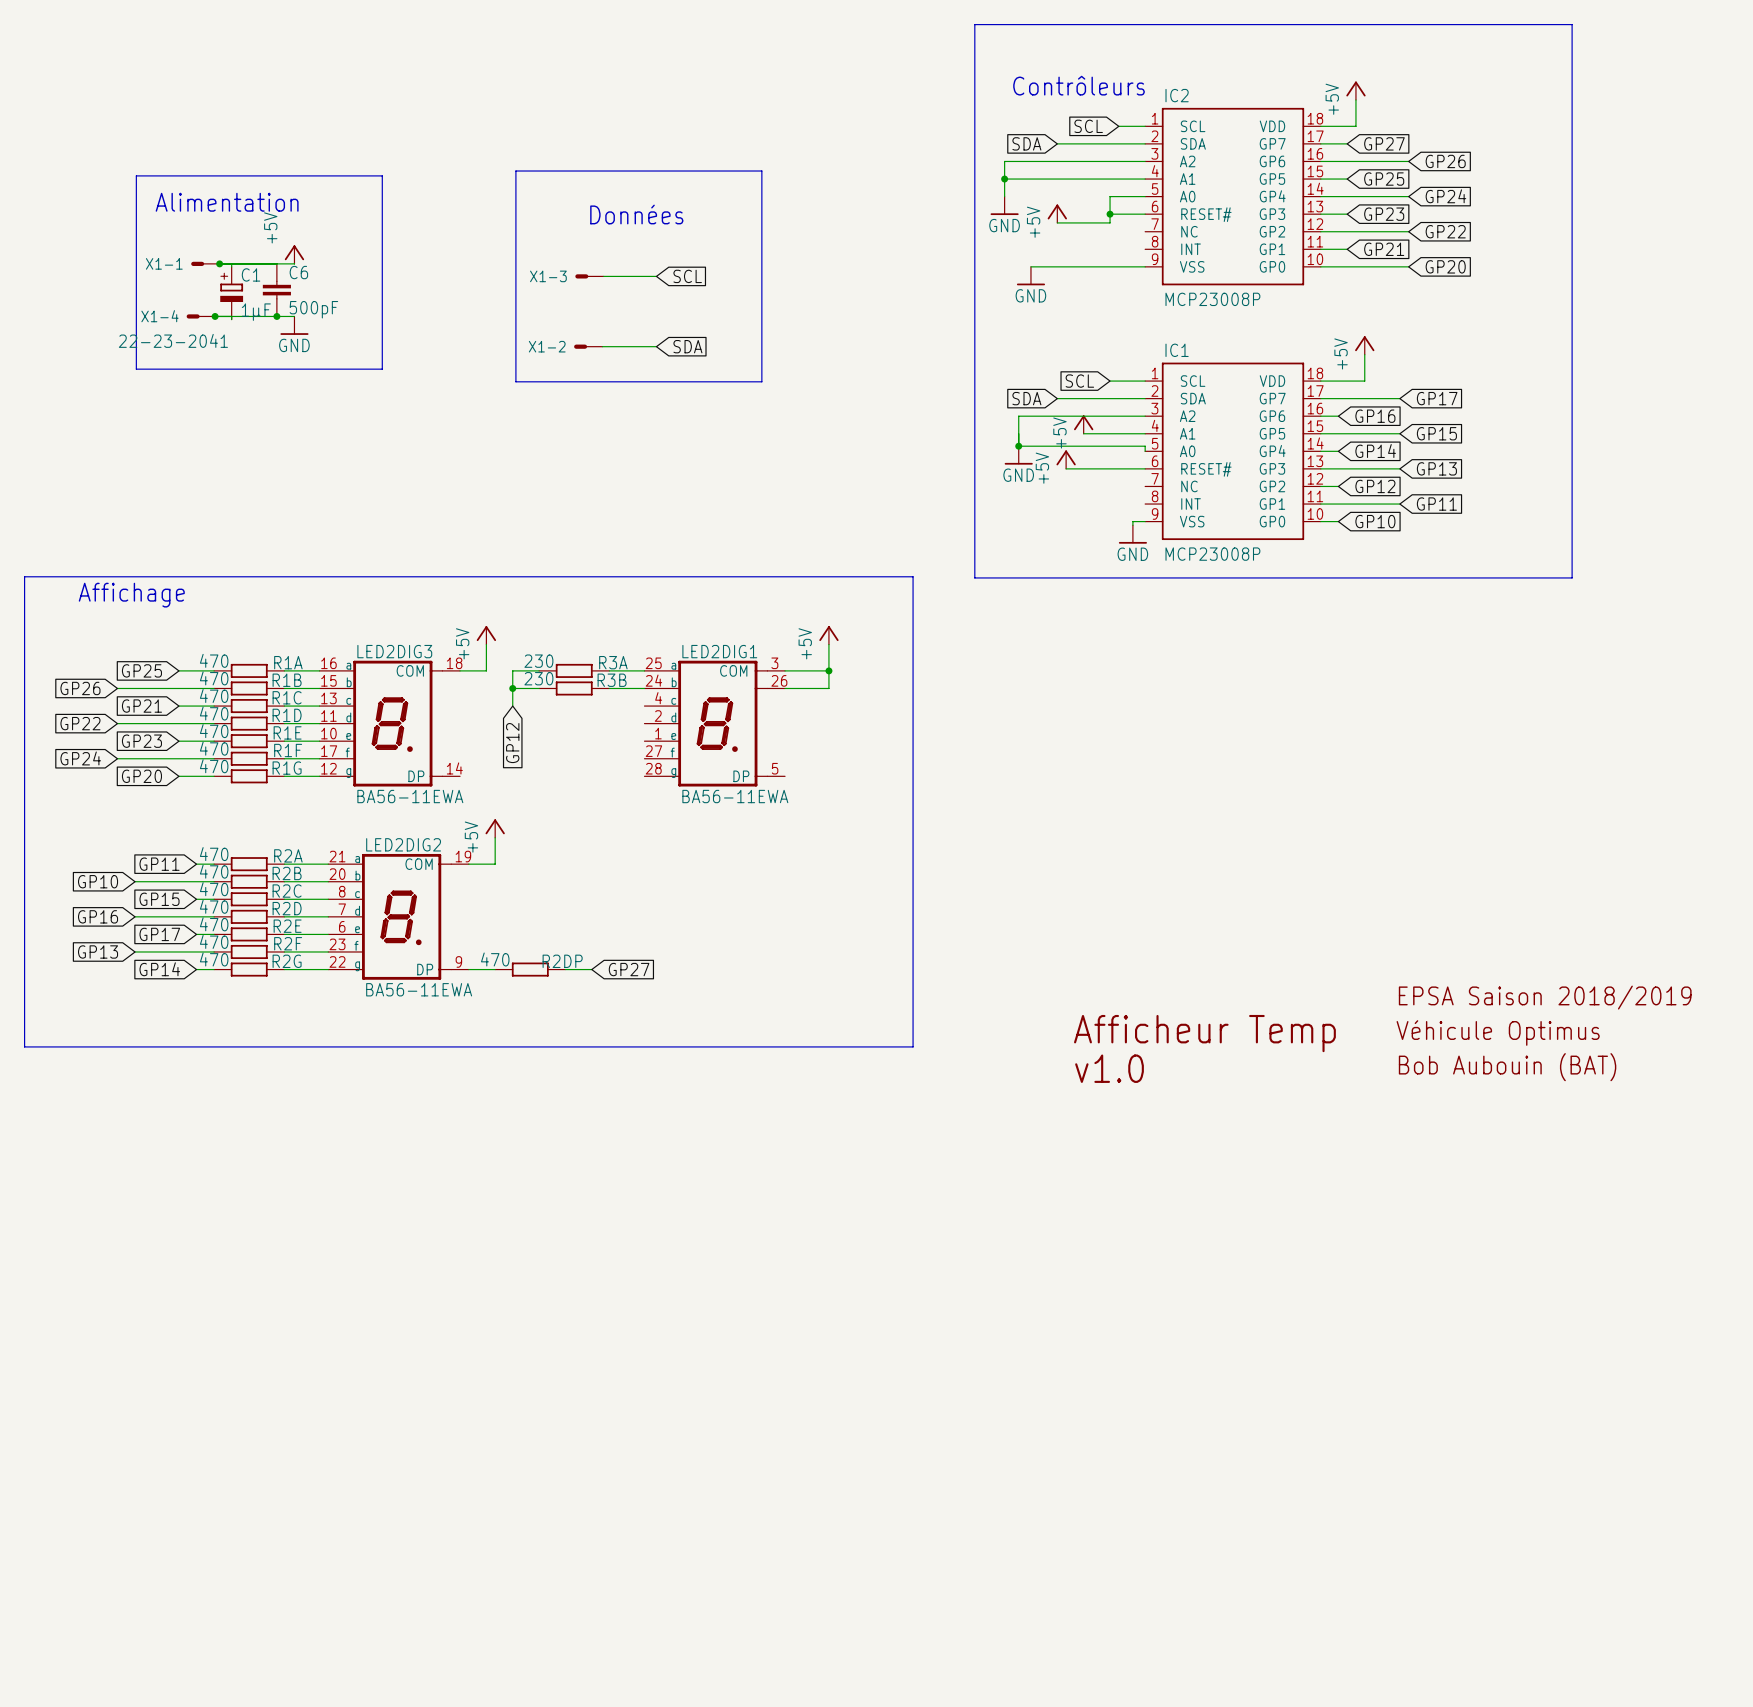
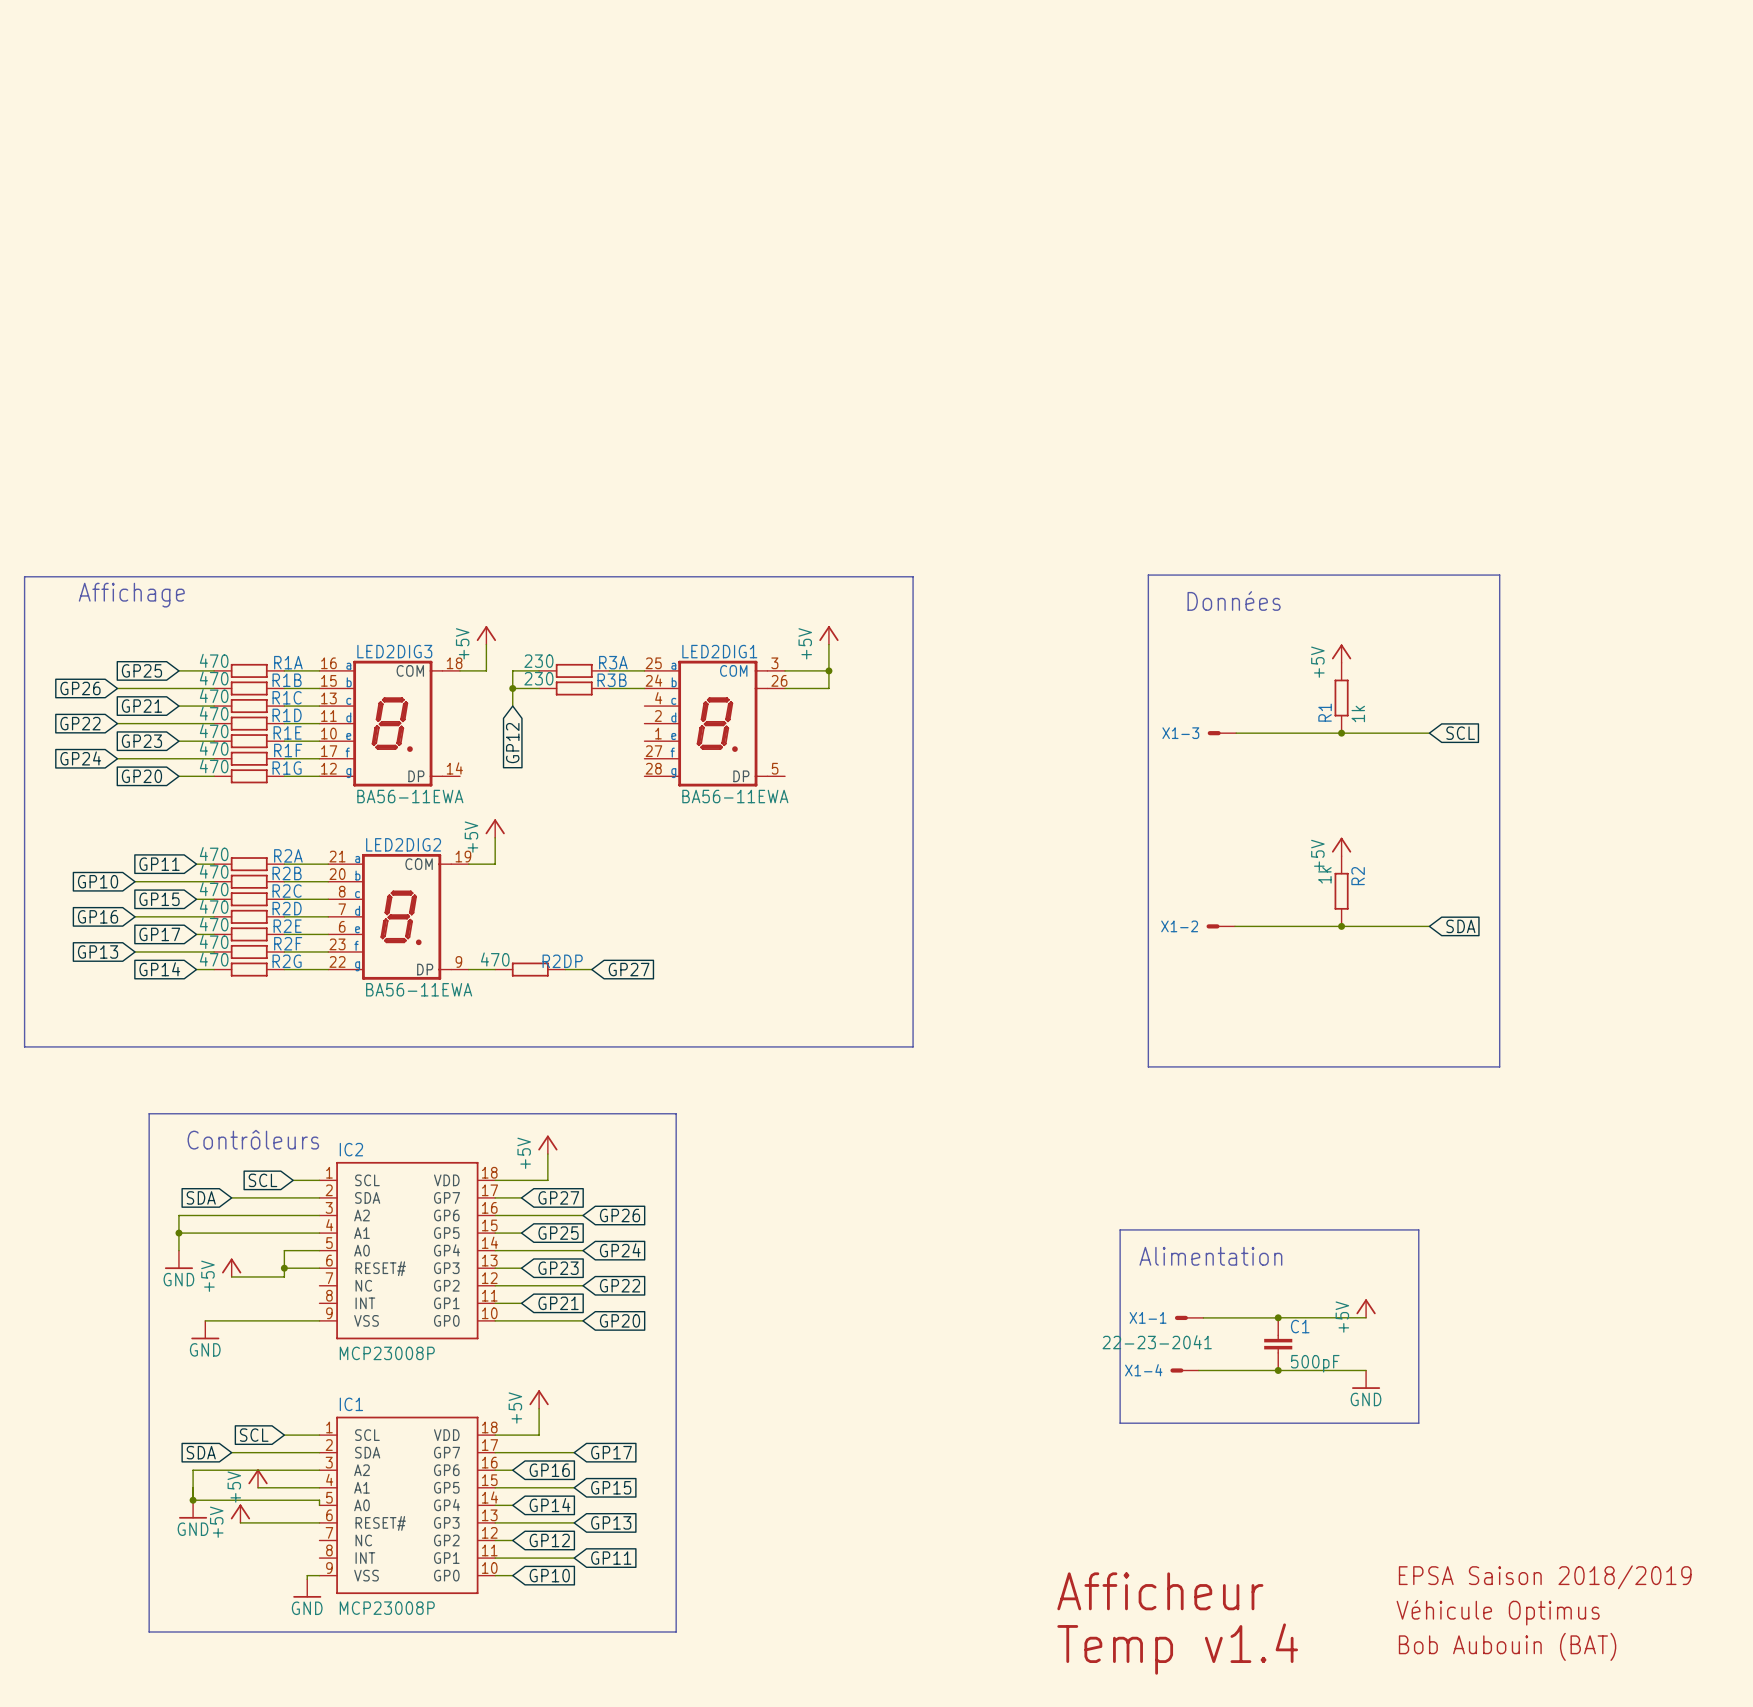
line: (974, 24) (1572, 24) (1572, 577) (974, 577) (974, 24) -> none
text: Contrôleurs (1079, 85) -> none
power symbol: +5V (1355, 90) -> none
wire: (1355, 99) (1355, 126) (1320, 126) -> none
global label: SCL (1088, 126) -> none
wire: (1118, 126) (1145, 126) -> none
global label: SDA (1026, 143) -> none
wire: (1057, 143) (1145, 143) -> none
wire: (1320, 143) (1347, 143) -> none
global label: GP27 (1384, 143) -> none
wire: (1145, 161) (1004, 161) (1004, 196) -> none
wire: (1320, 161) (1408, 161) -> none
global label: GP26 (1445, 161) -> none
line: (515, 171) (515, 381) (761, 381) (761, 171) (515, 171) -> none
line: (136, 175) (136, 369) (382, 369) (382, 175) (136, 175) -> none
wire: (1004, 179) (1145, 179) -> none
junction: (1004, 179) -> none
wire: (1320, 179) (1347, 179) -> none
global label: GP25 (1384, 179) -> none
wire: (1145, 196) (1110, 196) (1110, 222) (1057, 222) -> none
IC2 position: (1232, 196) -> (407, 1250)
wire: (1320, 196) (1408, 196) -> none
global label: GP24 (1445, 196) -> none
text: Alimentation (227, 202) -> none
power symbol: GND (1004, 205) -> none
power symbol: +5V (1057, 213) -> none
text: Données (636, 214) -> none
wire: (1110, 214) (1145, 214) -> none
junction: (1110, 214) -> none
wire: (1320, 214) (1347, 214) -> none
global label: GP23 (1384, 214) -> none
wire: (1320, 231) (1408, 231) -> none
global label: GP22 (1445, 231) -> none
wire: (1320, 249) (1347, 249) -> none
global label: GP21 (1384, 249) -> none
power symbol: +5V (294, 254) -> none
X1-1 position: (205, 263) -> (1189, 1317)
wire: (219, 263) (294, 263) -> none
junction: (219, 263) -> none
wire: (231, 263) (231, 266) -> none
C1 symbol: [220, 266, 244, 320] -> [1264, 1317, 1293, 1371]
wire: (1030, 266) (1145, 266) -> none
wire: (1320, 266) (1408, 266) -> none
global label: GP20 (1445, 266) -> none
X1-3 position: (589, 276) -> (1221, 733)
wire: (603, 276) (656, 276) -> none
global label: SCL (687, 276) -> none
power symbol: GND (1030, 276) -> none
C6: 500pF (276, 290) -> none
C1 value: 1µF (256, 312) -> 500pF (1315, 1363)
X1-4 position: (200, 316) -> (1184, 1370)
wire: (215, 316) (294, 316) -> none
junction: (215, 316) -> none
wire: (231, 316) (231, 319) -> none
junction: (276, 316) -> none
power symbol: GND (294, 325) -> none
X1-1 value position: 22-23-2041 (173, 340) -> 22-23-2041 (1157, 1342)
power symbol: +5V (1364, 345) -> none
X1-2 position: (588, 346) -> (1220, 926)
wire: (602, 346) (656, 346) -> none
global label: SDA (687, 346) -> none
wire: (1364, 354) (1364, 381) (1320, 381) -> none
global label: SCL (1079, 381) -> none
wire: (1110, 381) (1145, 381) -> none
global label: SDA (1026, 398) -> none
wire: (1057, 398) (1145, 398) -> none
wire: (1320, 398) (1399, 398) -> none
global label: GP17 (1437, 398) -> none
wire: (1145, 416) (1018, 416) (1018, 446) (1145, 446) (1145, 451) -> none
wire: (1320, 416) (1338, 416) -> none
global label: GP16 (1375, 416) -> none
power symbol: +5V (1083, 424) -> none
wire: (1083, 433) (1145, 433) -> none
wire: (1320, 433) (1399, 433) -> none
global label: GP15 (1436, 433) -> none
junction: (1018, 446) -> none
IC1 position: (1232, 451) -> (407, 1505)
wire: (1320, 451) (1338, 451) -> none
global label: GP14 (1375, 451) -> none
power symbol: GND (1018, 455) -> none
power symbol: +5V (1066, 459) -> none
wire: (1066, 468) (1145, 468) -> none
wire: (1320, 468) (1399, 468) -> none
global label: GP13 (1436, 468) -> none
wire: (1320, 486) (1338, 486) -> none
global label: GP12 (1375, 486) -> none
wire: (1320, 504) (1399, 504) -> none
global label: GP11 (1436, 504) -> none
wire: (1145, 521) (1132, 521) (1132, 525) -> none
wire: (1320, 521) (1338, 521) -> none
global label: GP10 (1375, 521) -> none
power symbol: GND (1132, 534) -> none
line: none -> (1148, 575) (1148, 1066) (1499, 1066) (1499, 575) (1148, 575)
text: none -> Données (1234, 600)
power symbol: none -> +5V (1341, 653)
R1: none -> 1k (1341, 698)
wire: none -> (1236, 733) (1429, 733)
junction: none -> (1341, 733)
global label: none -> SCL (1460, 733)
power symbol: none -> +5V (1341, 846)
R2: none -> 1k (1341, 891)
wire: none -> (1234, 926) (1429, 926)
junction: none -> (1341, 926)
global label: none -> SDA (1460, 926)
text: EPSA Saison 2018/2019 (1545, 997) -> none
text: Afficheur Temp (1204, 1033) -> none
text: Véhicule Optimus (1498, 1033) -> none
text: Bob Aubouin (BAT) (1507, 1067) -> none
text: v1.0 (1109, 1068) -> none
line: none -> (149, 1113) (676, 1113) (676, 1631) (149, 1631) (149, 1113)
text: none -> Contrôleurs (253, 1139)
power symbol: none -> +5V (547, 1144)
wire: none -> (547, 1154) (547, 1180) (495, 1180)
global label: none -> SCL (262, 1180)
wire: none -> (293, 1180) (319, 1180)
global label: none -> SDA (201, 1197)
wire: none -> (231, 1197) (319, 1197)
wire: none -> (495, 1197) (521, 1197)
global label: none -> GP27 (558, 1197)
wire: none -> (319, 1215) (178, 1215) (178, 1250)
wire: none -> (495, 1215) (583, 1215)
global label: none -> GP26 (620, 1215)
line: none -> (1120, 1229) (1120, 1423) (1418, 1423) (1418, 1229) (1120, 1229)
wire: none -> (178, 1233) (319, 1233)
junction: none -> (178, 1233)
wire: none -> (495, 1233) (521, 1233)
global label: none -> GP25 (558, 1233)
wire: none -> (319, 1250) (284, 1250) (284, 1276) (231, 1276)
wire: none -> (495, 1250) (583, 1250)
global label: none -> GP24 (620, 1250)
text: none -> Alimentation (1210, 1256)
power symbol: none -> GND (178, 1259)
power symbol: none -> +5V (231, 1267)
wire: none -> (284, 1268) (319, 1268)
junction: none -> (284, 1268)
wire: none -> (495, 1268) (521, 1268)
global label: none -> GP23 (558, 1268)
wire: none -> (495, 1285) (583, 1285)
global label: none -> GP22 (620, 1285)
wire: none -> (495, 1303) (521, 1303)
global label: none -> GP21 (558, 1303)
power symbol: none -> +5V (1366, 1308)
wire: none -> (1203, 1317) (1278, 1317)
wire: none -> (1278, 1317) (1366, 1317)
junction: none -> (1278, 1317)
wire: none -> (205, 1320) (319, 1320)
wire: none -> (495, 1320) (583, 1320)
global label: none -> GP20 (620, 1320)
power symbol: none -> GND (205, 1330)
wire: none -> (1198, 1370) (1366, 1370)
junction: none -> (1278, 1370)
power symbol: none -> GND (1366, 1379)
power symbol: none -> +5V (539, 1399)
wire: none -> (539, 1408) (539, 1435) (495, 1435)
global label: none -> SCL (254, 1435)
wire: none -> (284, 1435) (319, 1435)
global label: none -> SDA (201, 1452)
wire: none -> (231, 1452) (319, 1452)
wire: none -> (495, 1452) (574, 1452)
global label: none -> GP17 (611, 1452)
wire: none -> (319, 1470) (193, 1470) (193, 1500) (319, 1500) (319, 1505)
wire: none -> (495, 1470) (512, 1470)
global label: none -> GP16 (549, 1470)
power symbol: none -> +5V (258, 1478)
wire: none -> (258, 1487) (319, 1487)
wire: none -> (495, 1487) (574, 1487)
global label: none -> GP15 (611, 1487)
junction: none -> (193, 1500)
wire: none -> (495, 1505) (512, 1505)
global label: none -> GP14 (550, 1505)
power symbol: none -> GND (193, 1509)
power symbol: none -> +5V (240, 1513)
wire: none -> (240, 1522) (319, 1522)
wire: none -> (495, 1522) (574, 1522)
global label: none -> GP13 (611, 1522)
wire: none -> (495, 1540) (512, 1540)
global label: none -> GP12 (549, 1540)
wire: none -> (495, 1558) (574, 1558)
global label: none -> GP11 (611, 1558)
wire: none -> (319, 1575) (307, 1575) (307, 1579)
wire: none -> (495, 1575) (512, 1575)
global label: none -> GP10 (549, 1575)
text: none -> EPSA Saison 2018/2019 (1545, 1577)
power symbol: none -> GND (307, 1588)
text: none -> Afficheur (1160, 1591)
text: none -> Véhicule Optimus (1498, 1612)
text: none -> Bob Aubouin (BAT) (1507, 1646)
text: none -> Temp v1.4 (1177, 1649)

